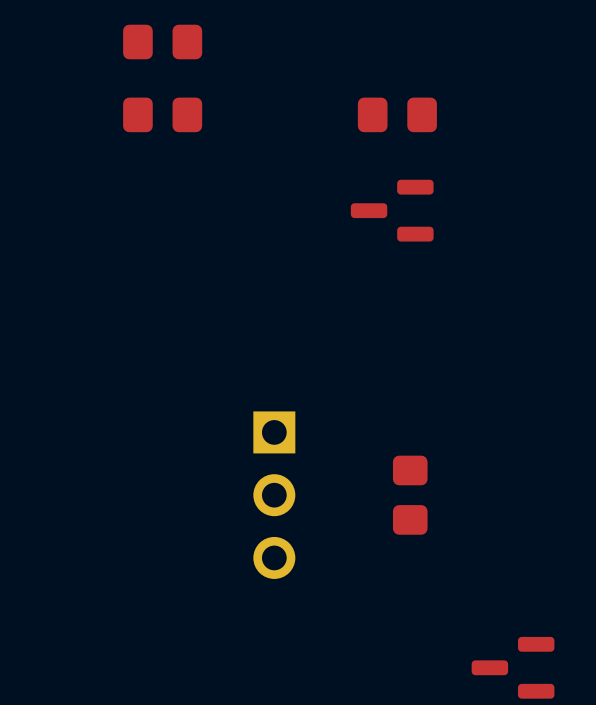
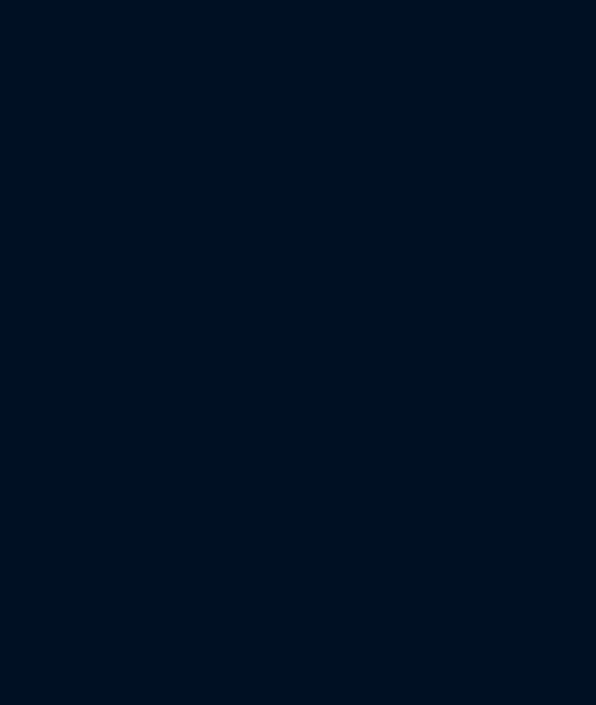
part: (162, 42) -> none
part: (162, 114) -> none
part: (397, 114) -> none
part: (392, 210) -> none
part: (274, 495) -> none
part: (410, 495) -> none
part: (513, 667) -> none

